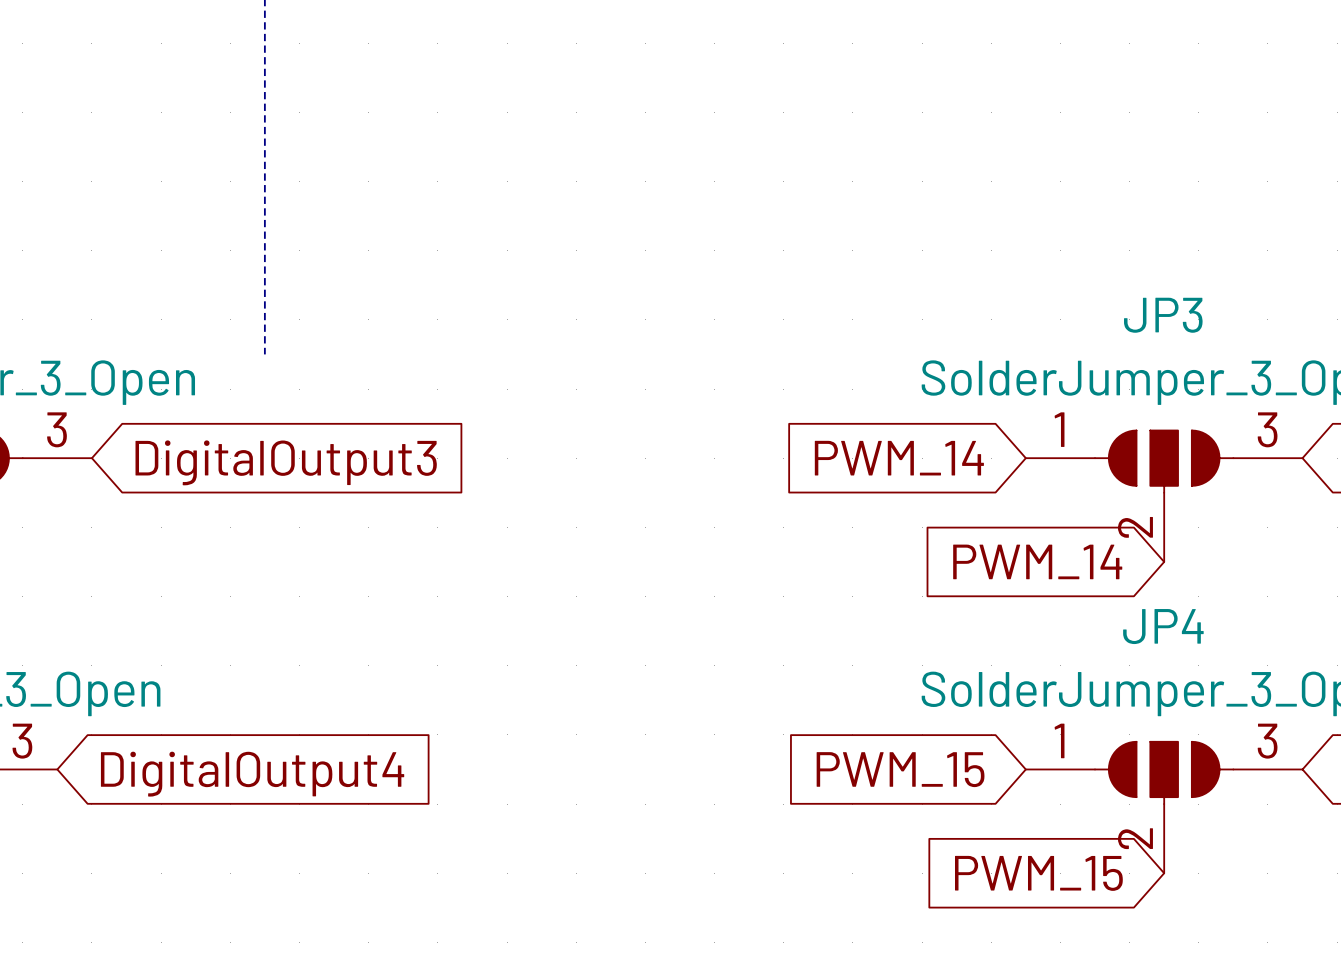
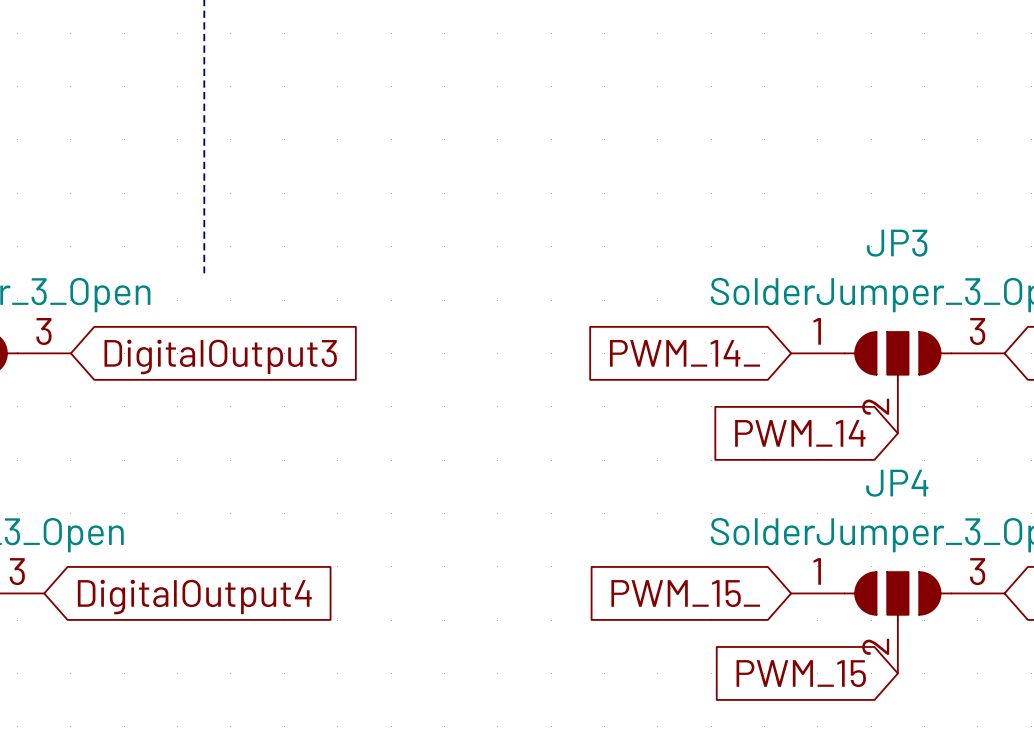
global label: PWM_14 (899, 458) -> PWM_14_ (685, 353)
global label: PWM_15 (900, 769) -> PWM_15_ (685, 593)

